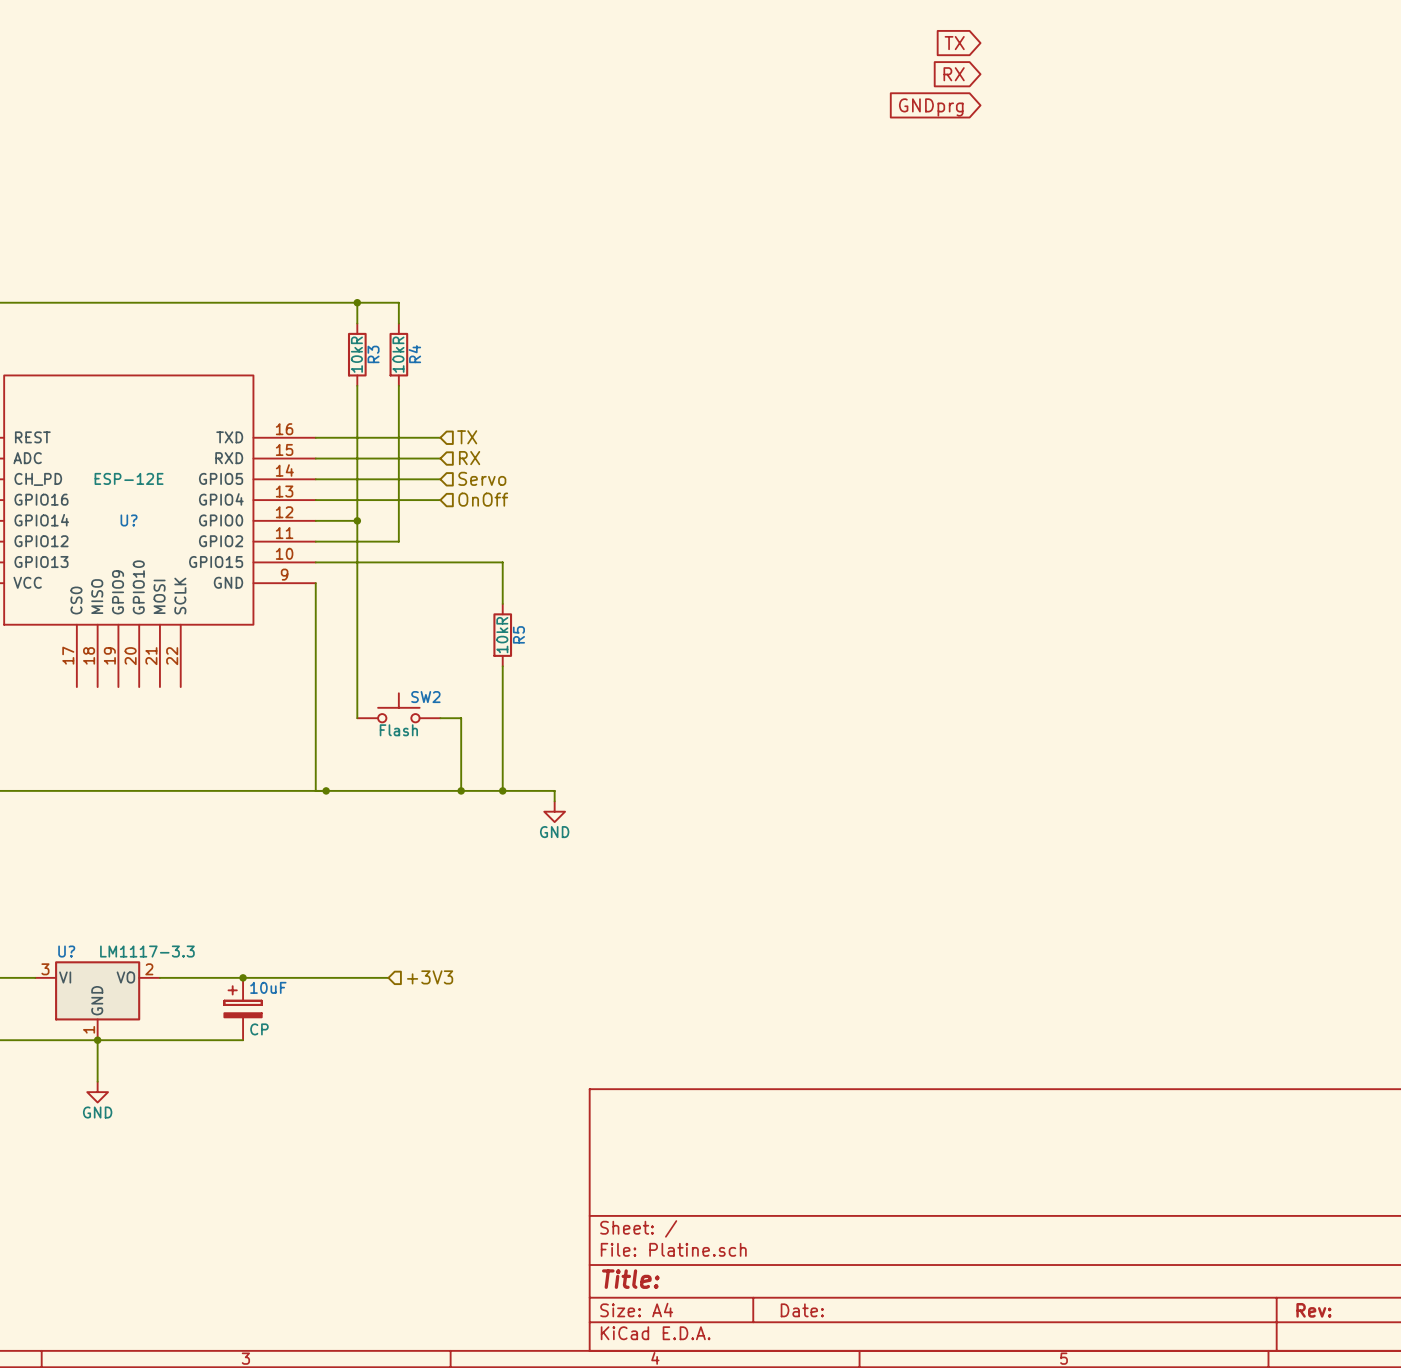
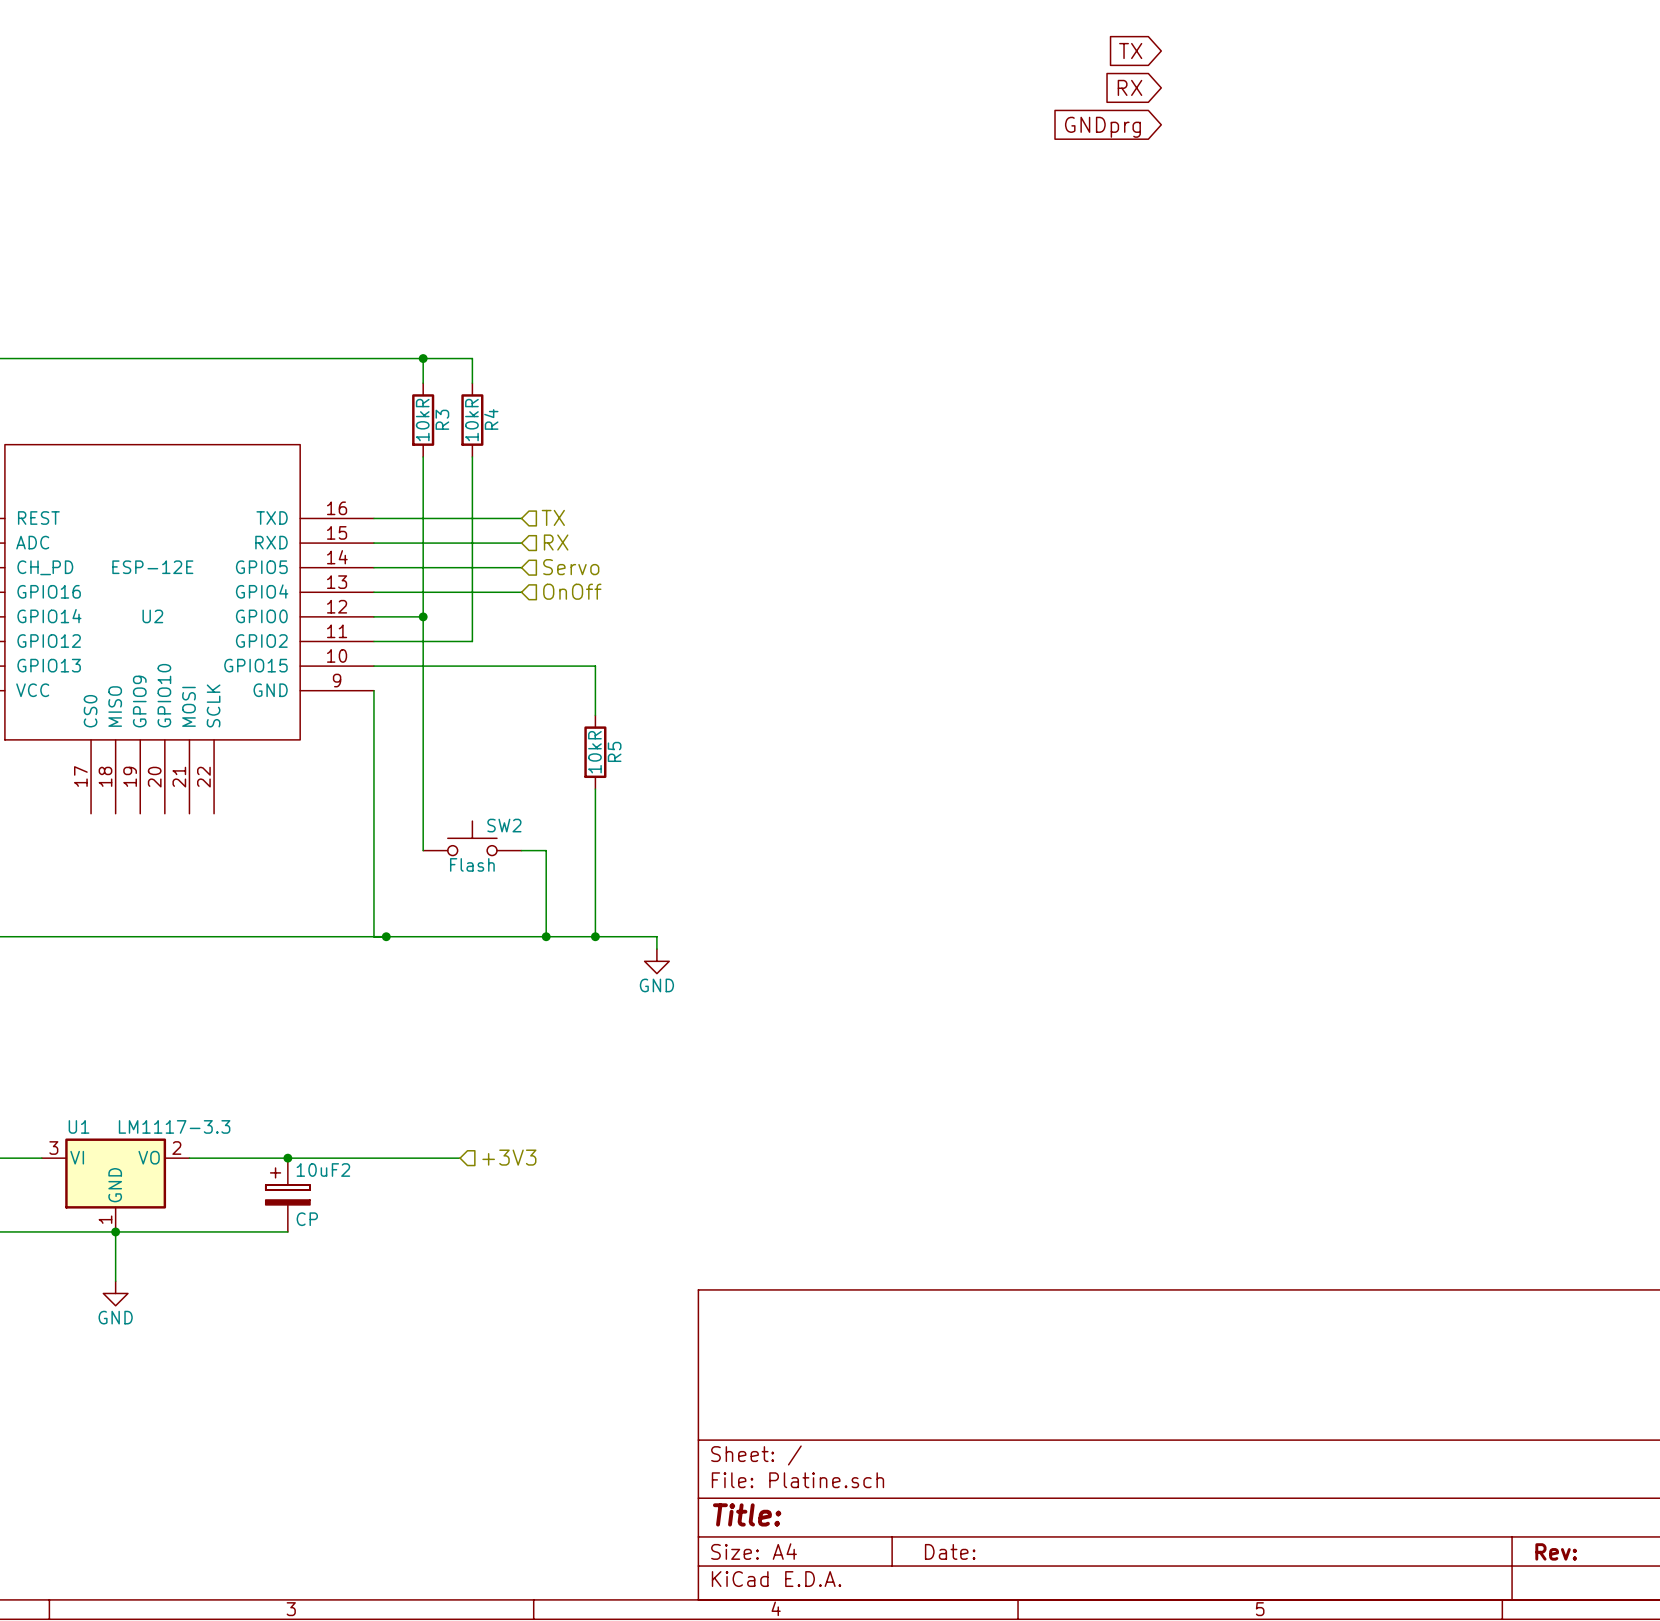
U? name: U? (129, 520) -> U2 (152, 616)
U? name: U? (66, 951) -> U1 (79, 1126)
10uF name: 10uF (268, 987) -> 10uF2 (323, 1170)

